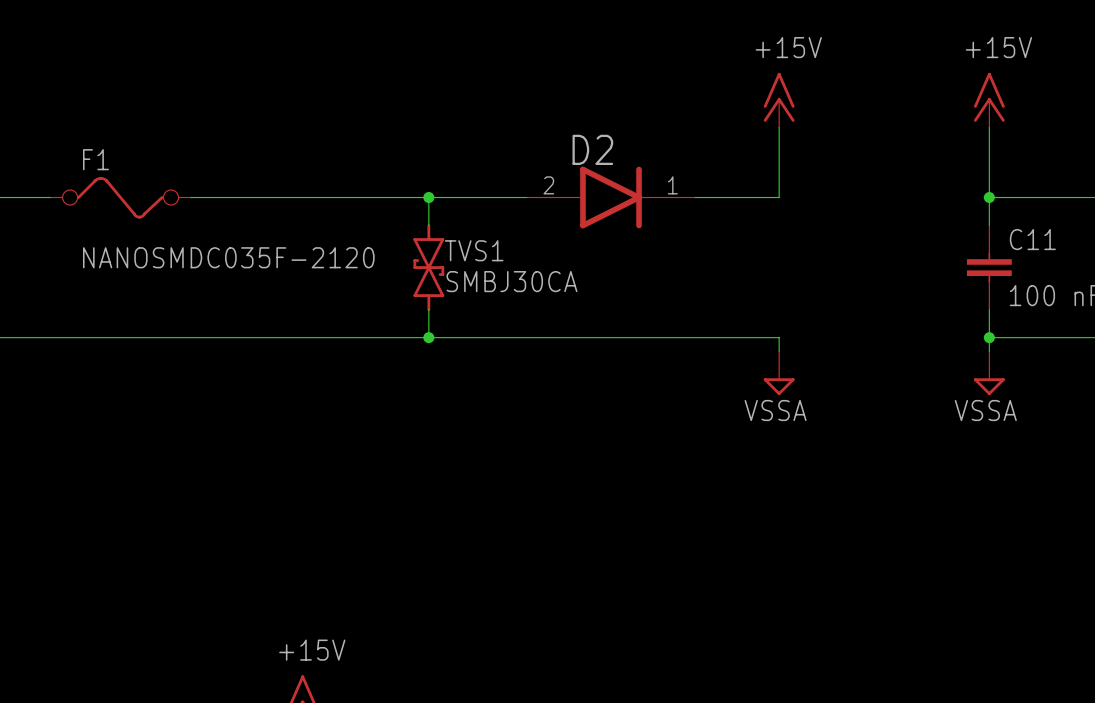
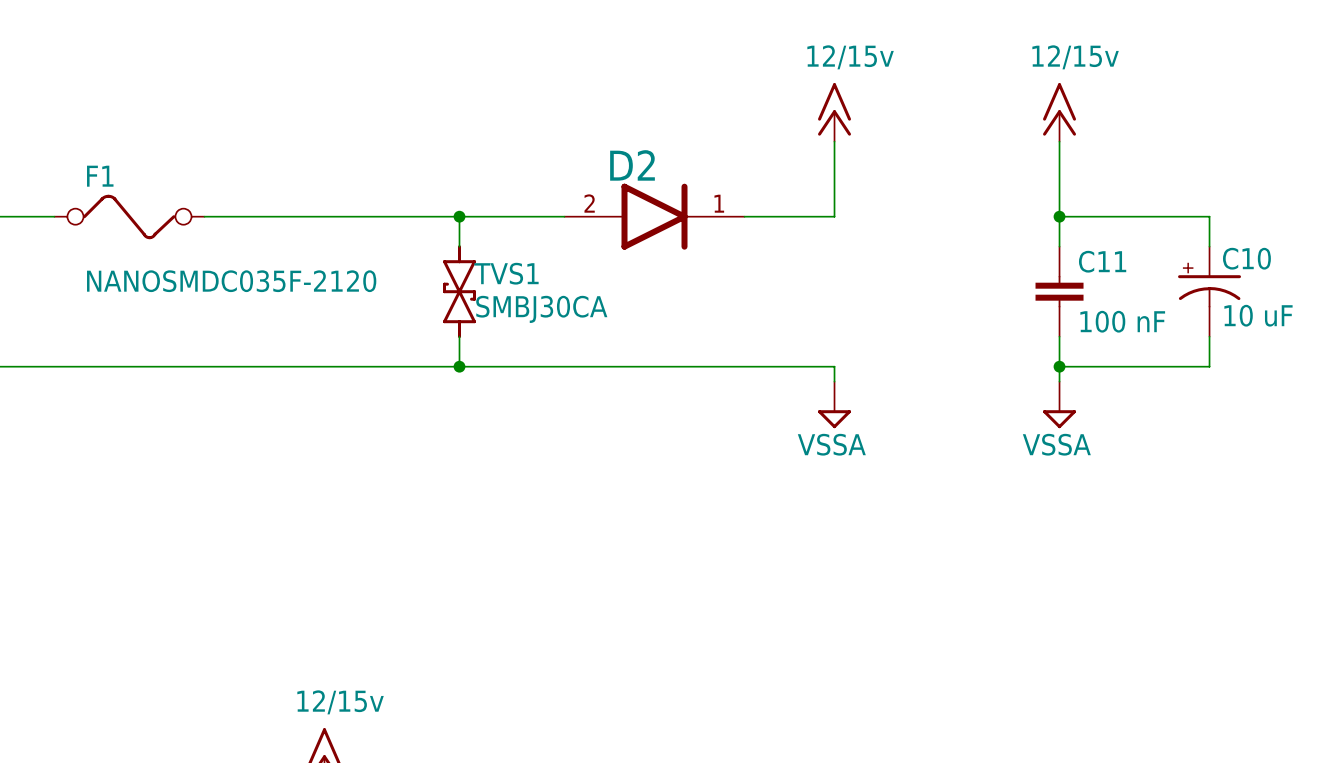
power symbol text: +15V (788, 47) -> none
power symbol text: +15V (998, 47) -> none
power symbol text: none -> 12/15v (850, 57)
power symbol text: none -> 12/15v (1075, 57)
power symbol text: +15V (312, 650) -> none
power symbol text: none -> 12/15v (340, 702)

